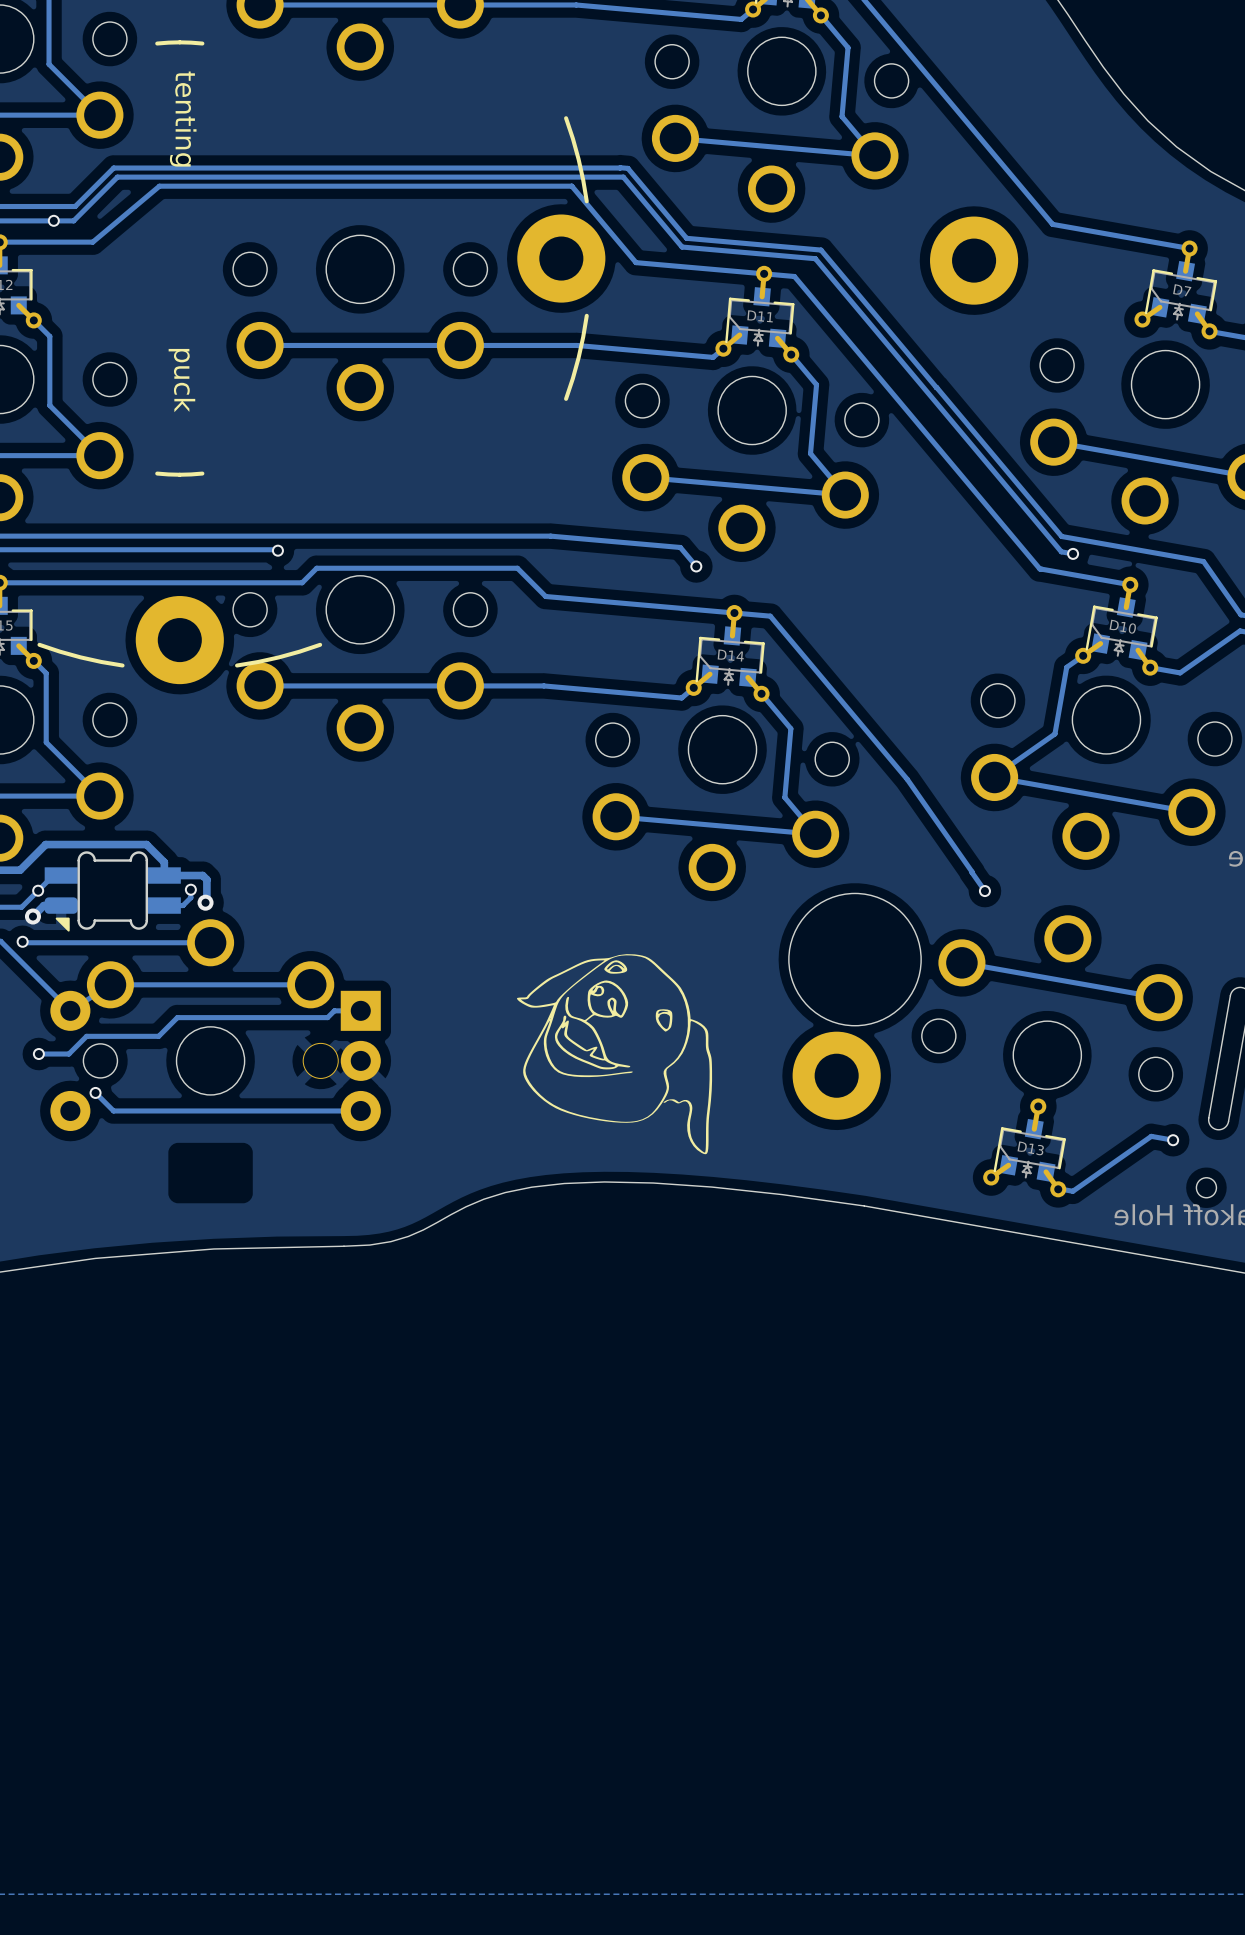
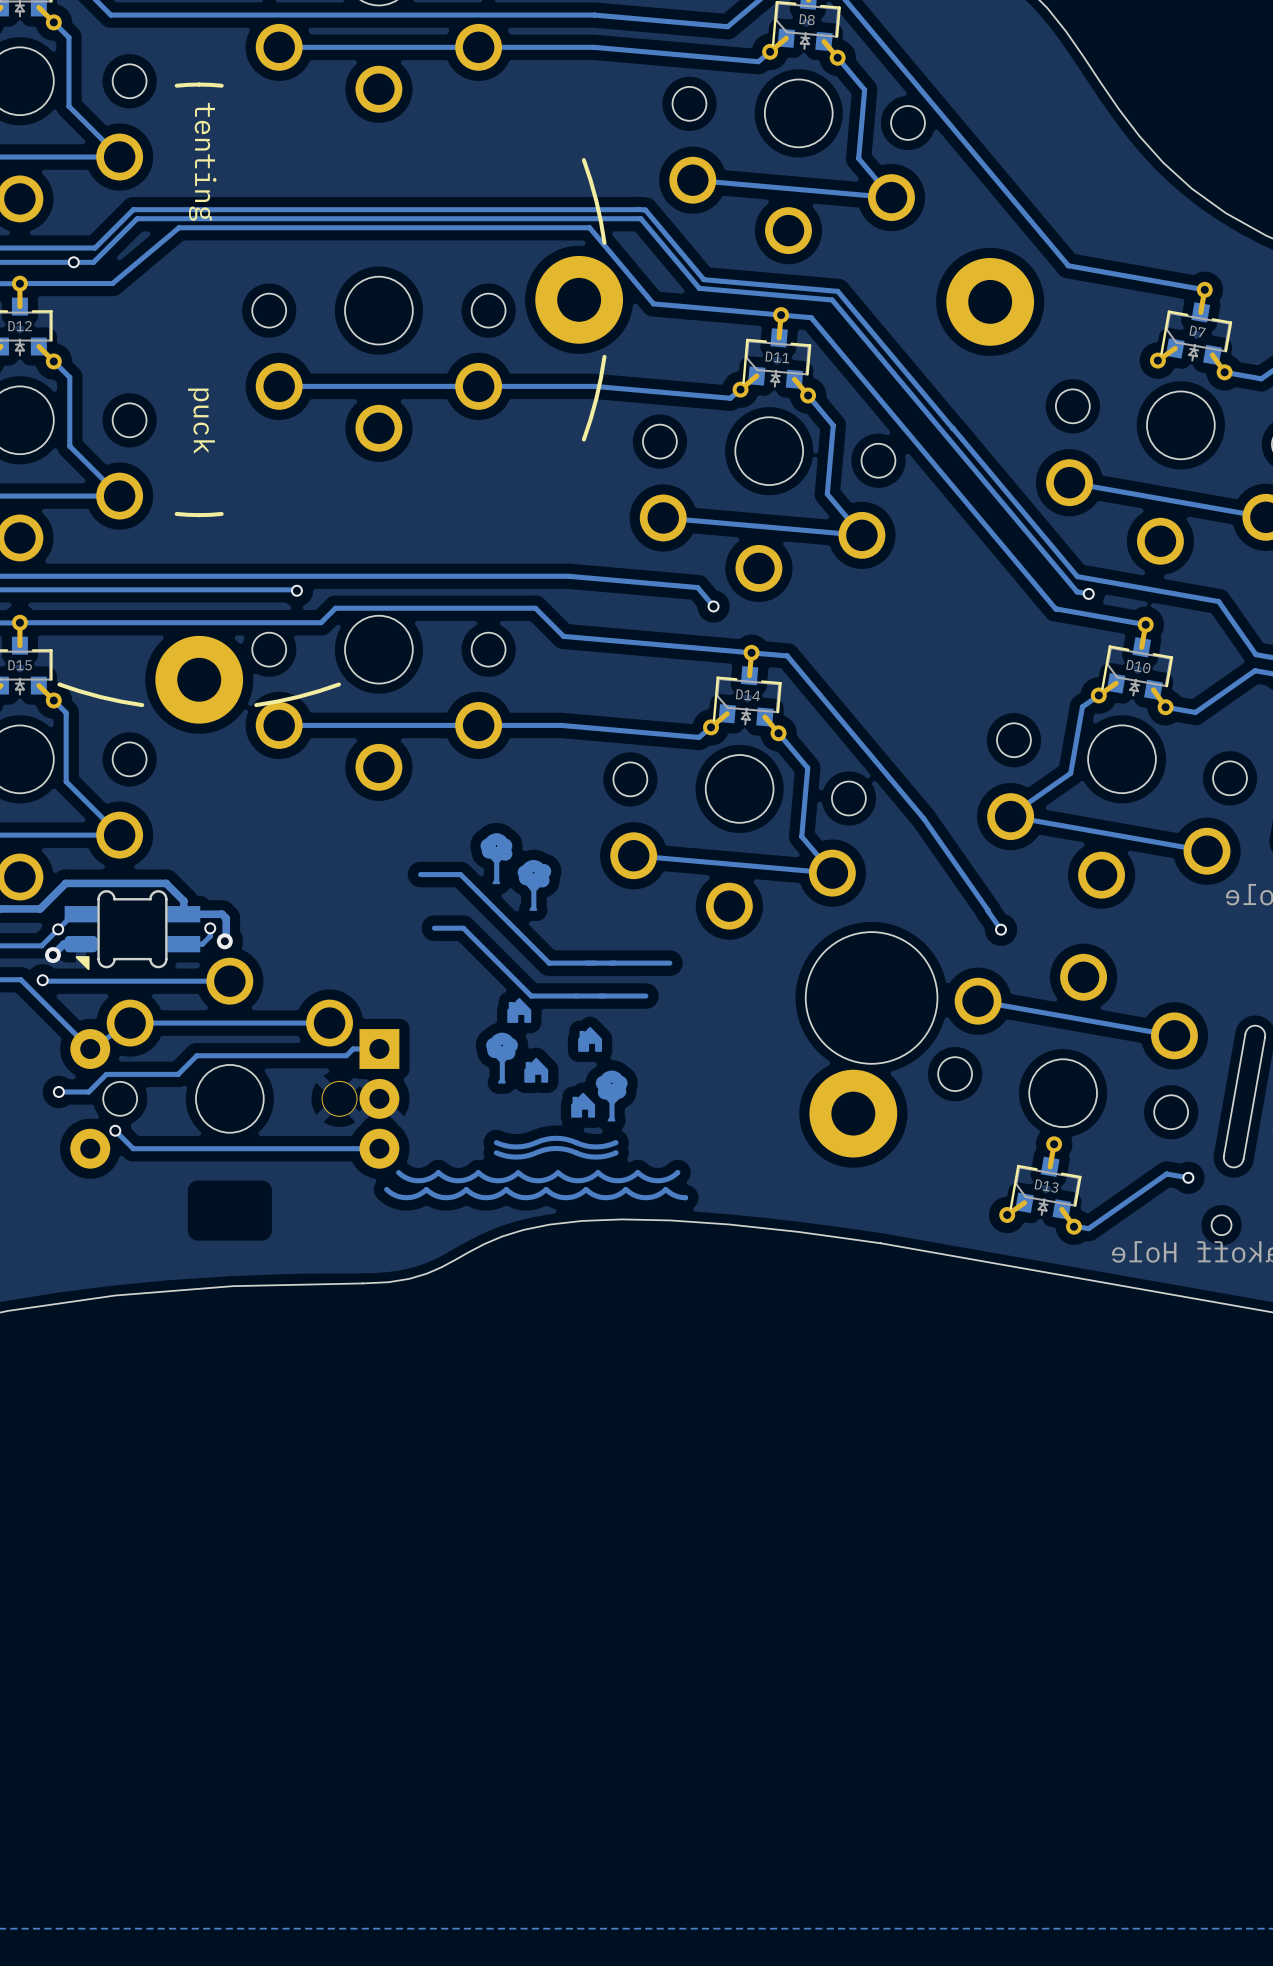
drawing: [517, 954, 713, 1155] -> none
part: none -> (536, 1016)

